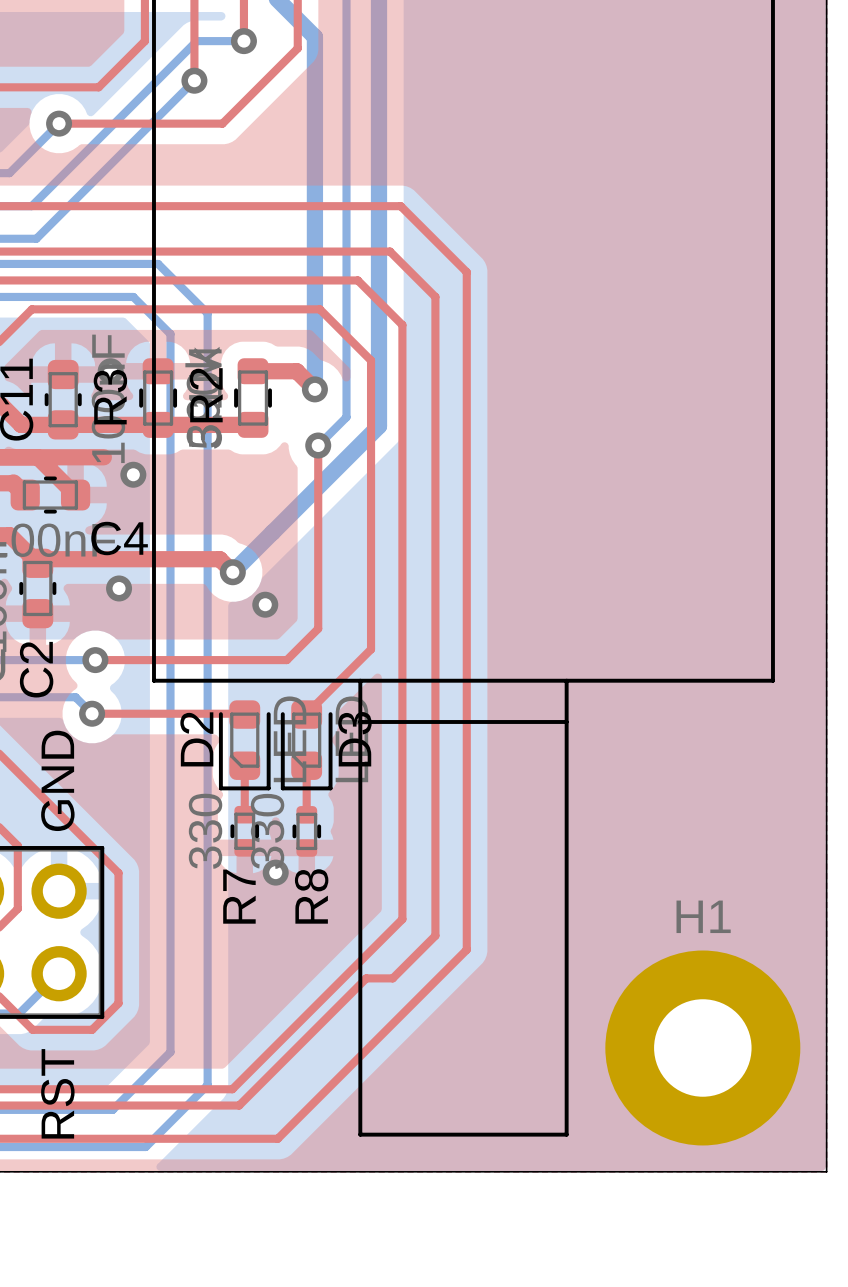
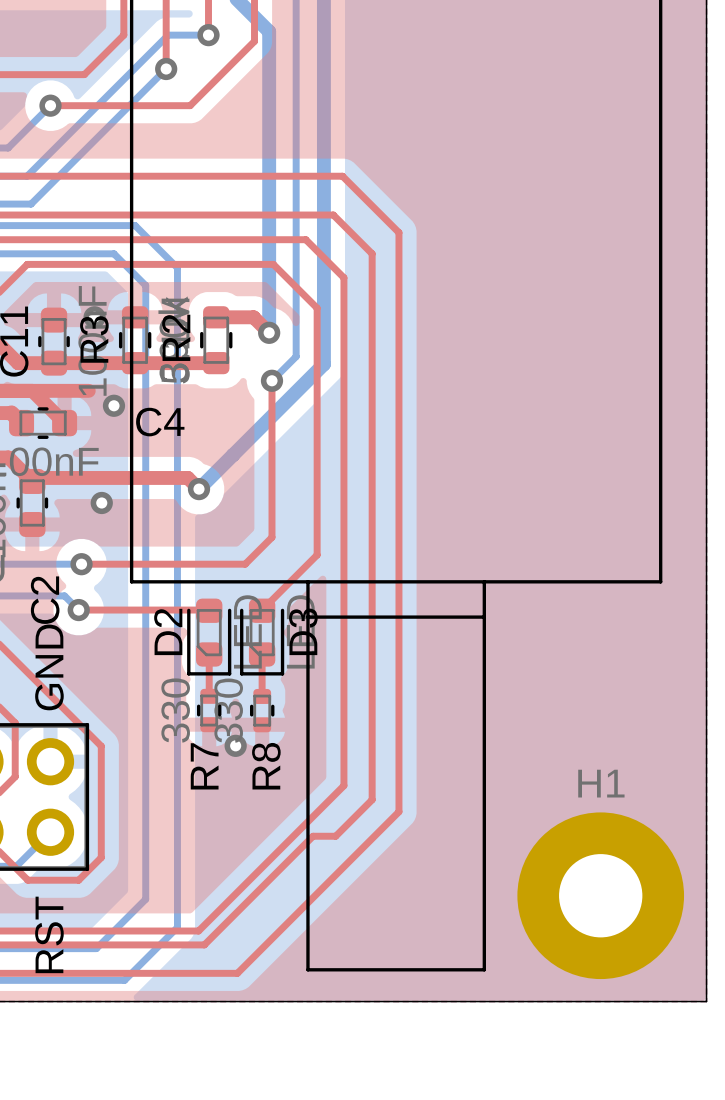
C4 name position: C4 (119, 538) -> C4 (160, 422)
via: (265, 604) -> none
C2 name position: C2 (36, 669) -> C2 (45, 600)

